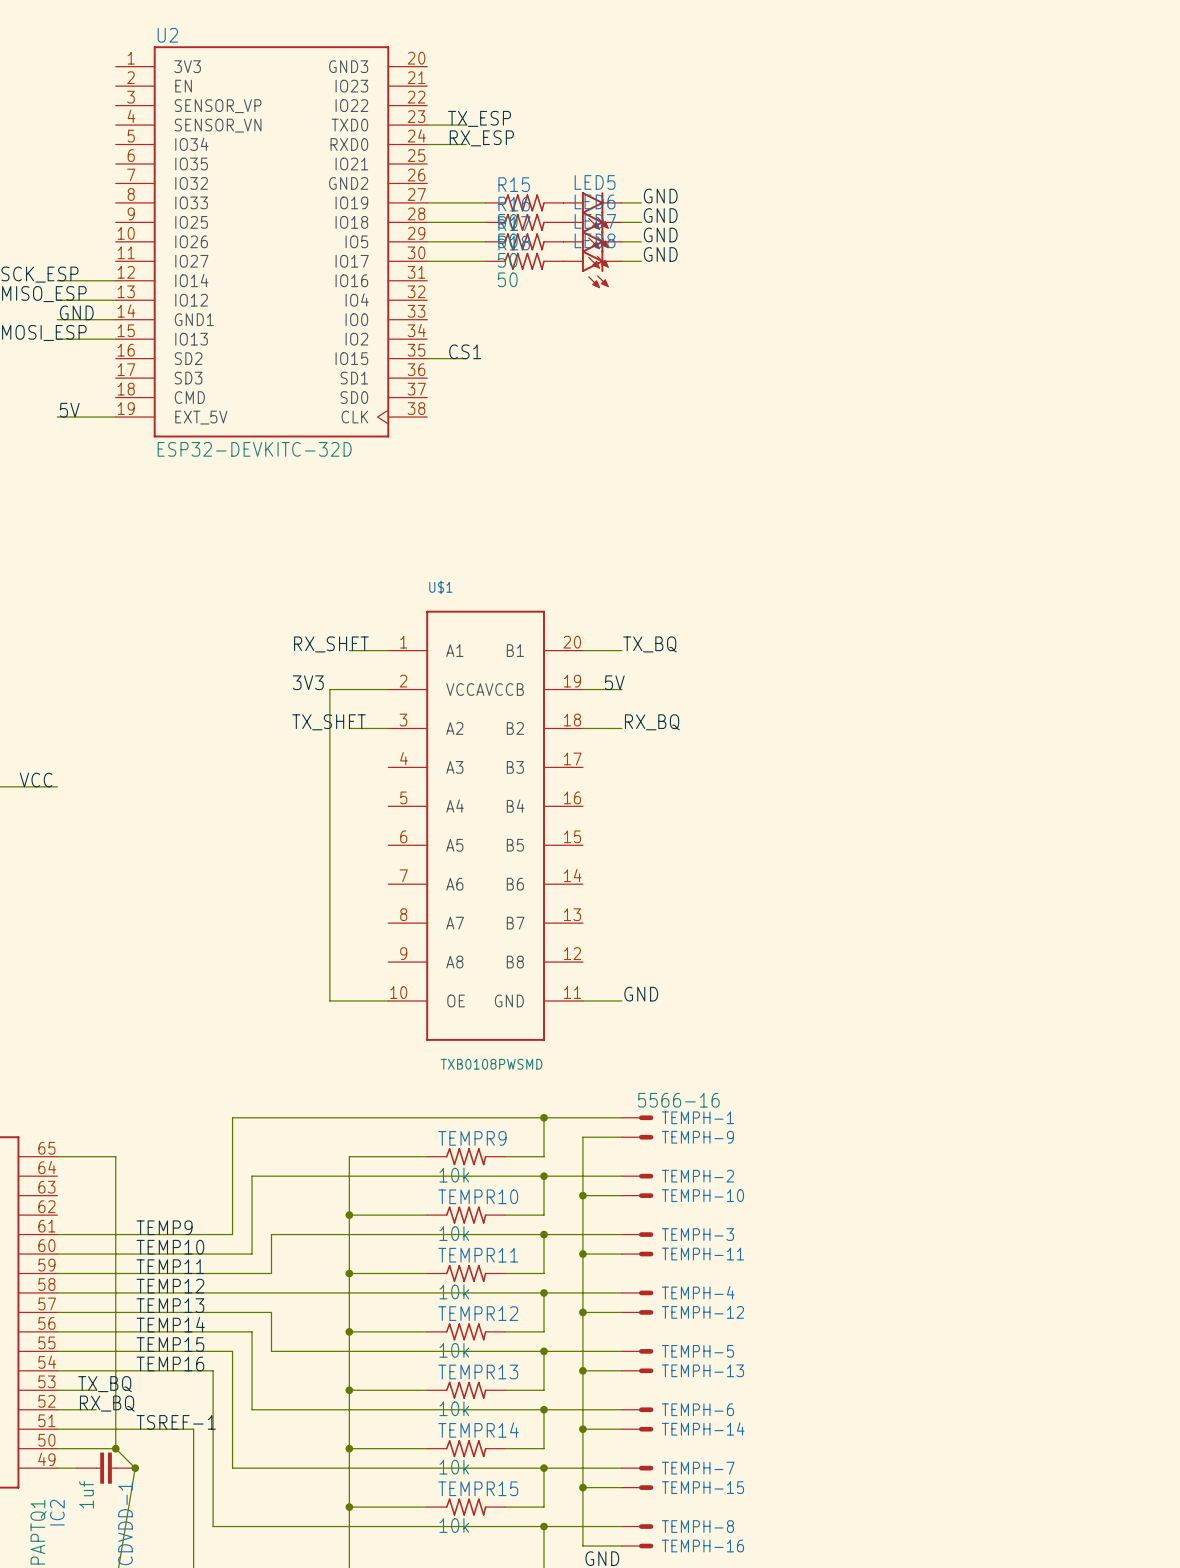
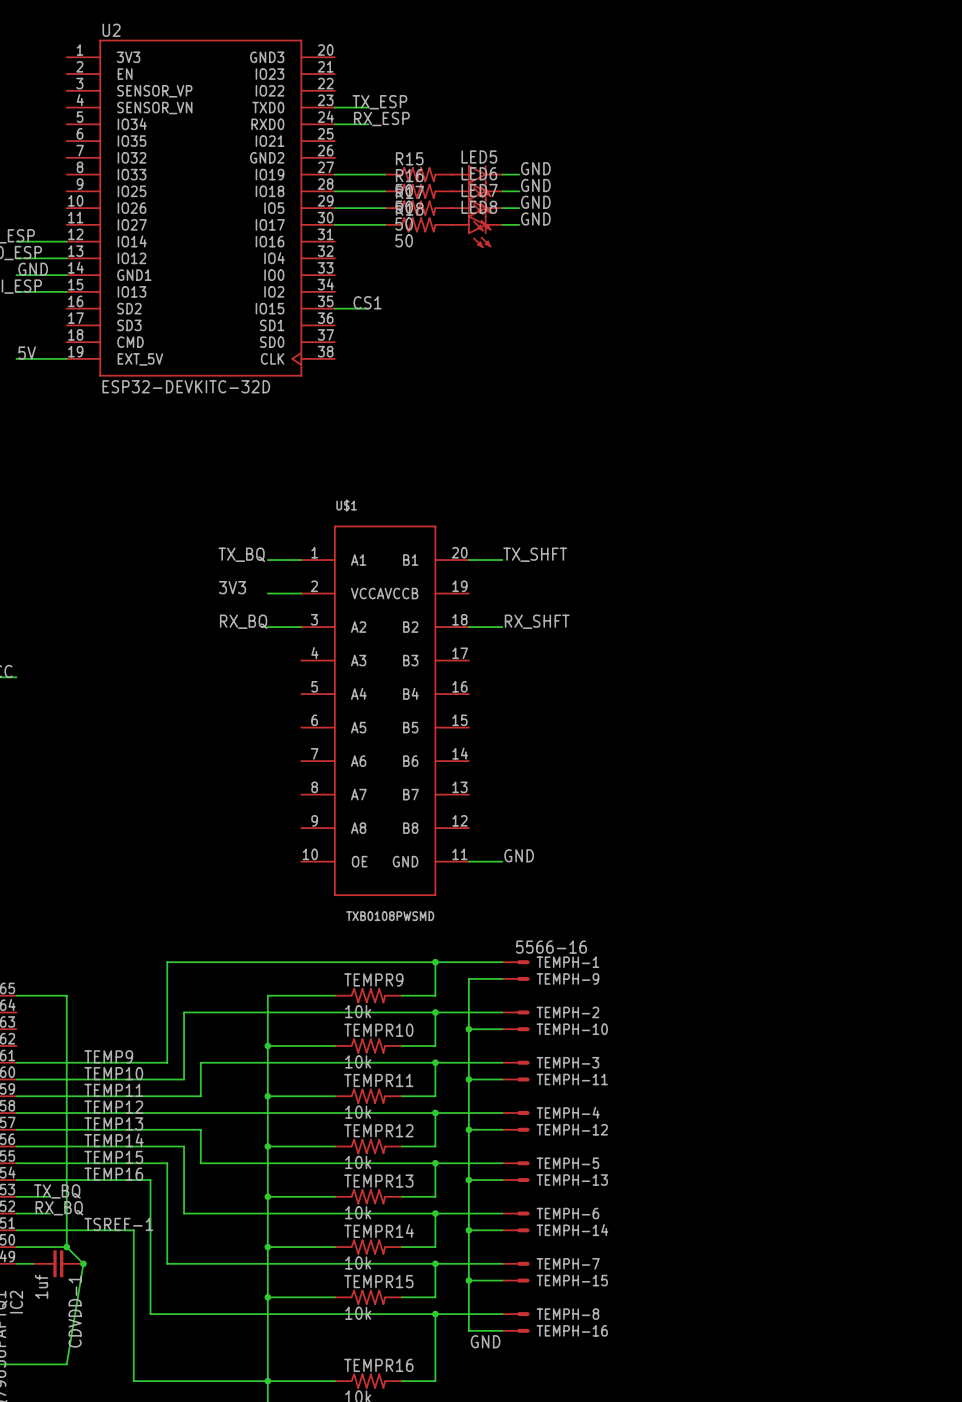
label: RX_SHFT (331, 644) -> TX_BQ (241, 554)
label: TX_BQ (650, 644) -> TX_SHFT (535, 554)
label: 5V (614, 682) -> none
wire: (349, 689) (329, 689) (329, 1000) (388, 1000) -> none
wire: (582, 689) (621, 689) -> none
label: TX_SHFT (329, 722) -> RX_BQ (243, 621)
label: RX_BQ (652, 722) -> RX_SHFT (537, 621)

